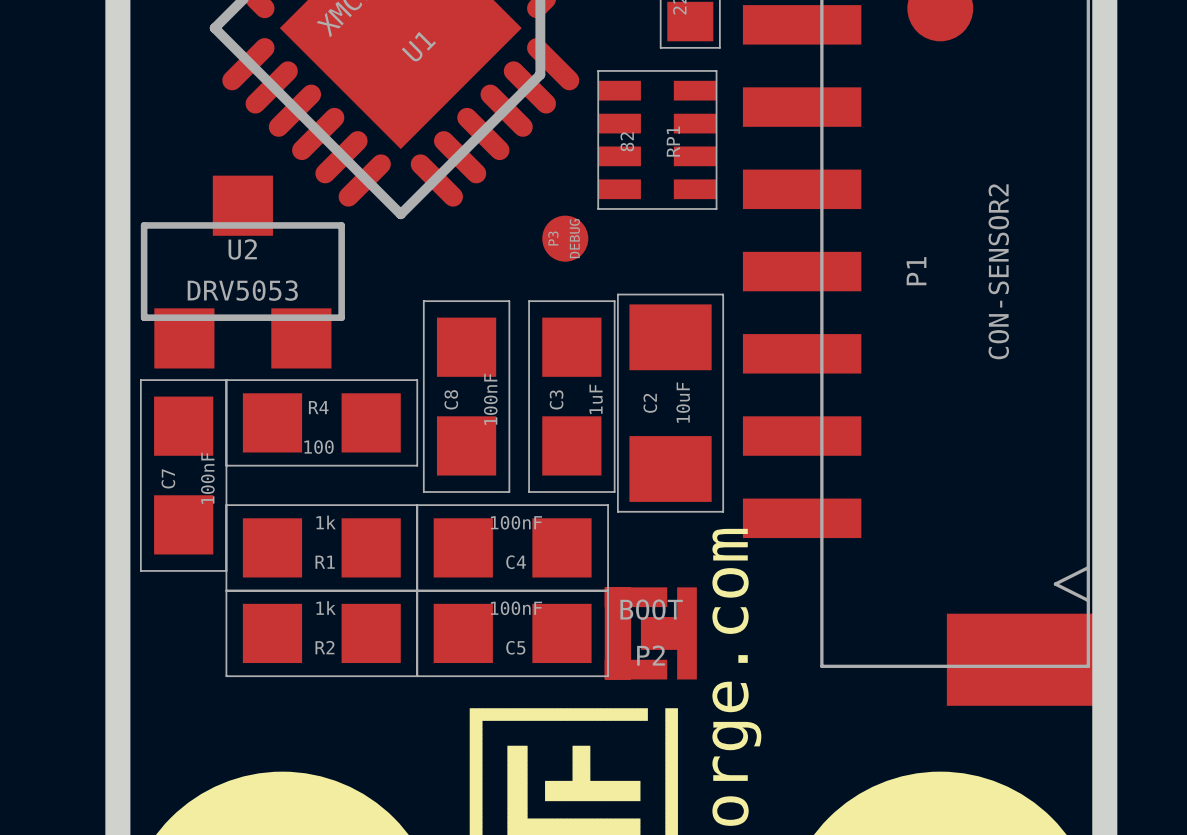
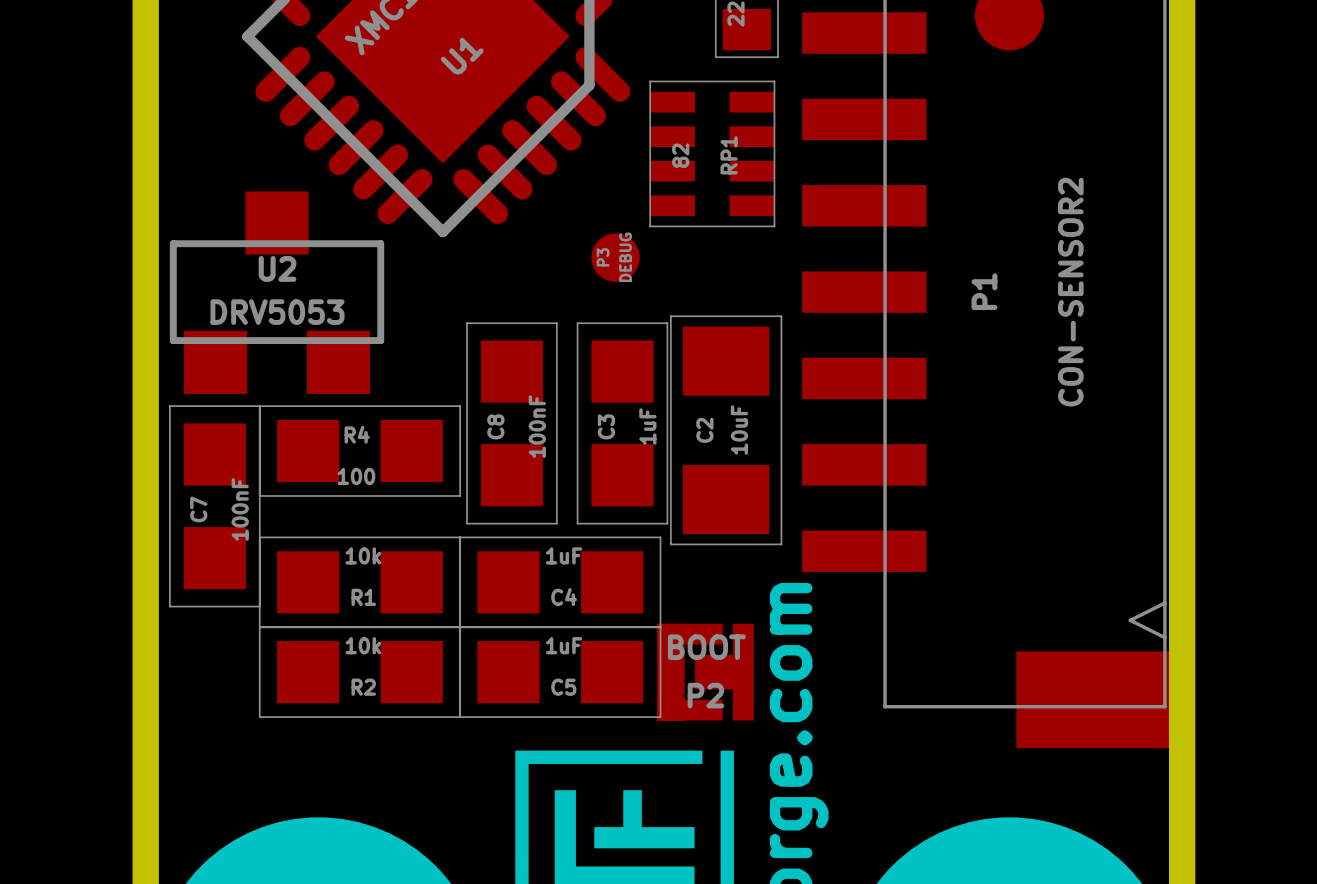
R1 value: 1k (326, 522) -> 10k (363, 555)
C4 value: 100nF (516, 522) -> 1uF (564, 555)
R2 value: 1k (326, 607) -> 10k (363, 645)
C5 value: 100nF (516, 608) -> 1uF (564, 645)

